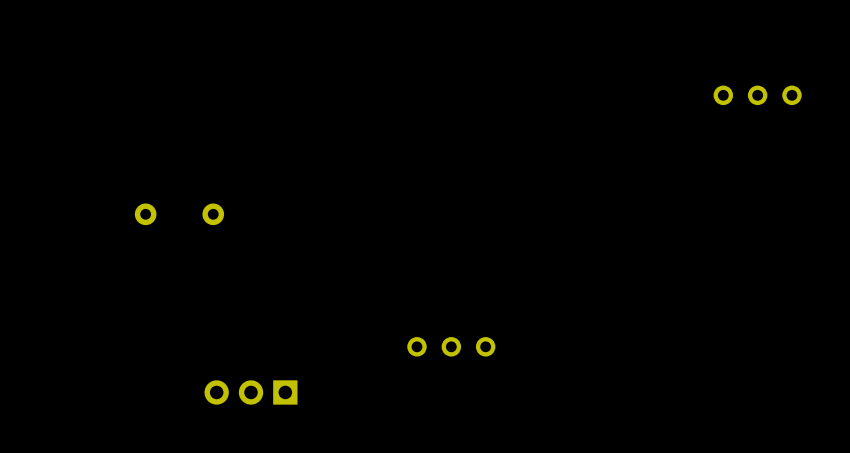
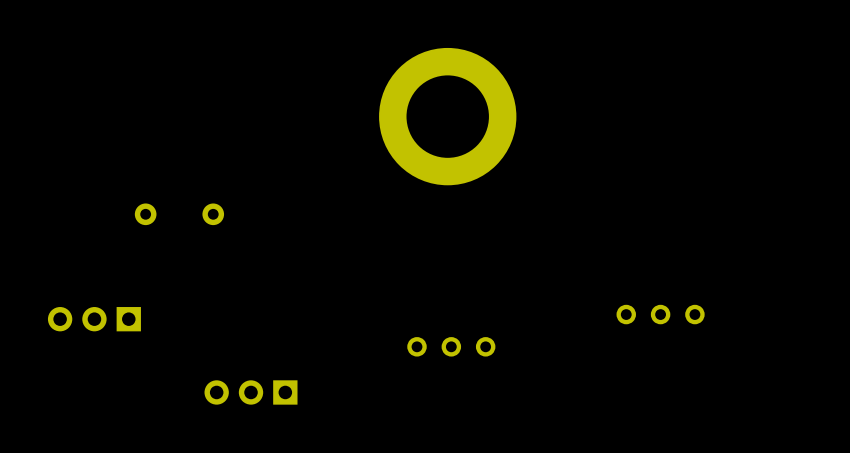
part position: (757, 95) -> (660, 314)
part: none -> (447, 116)
part: none -> (94, 319)

